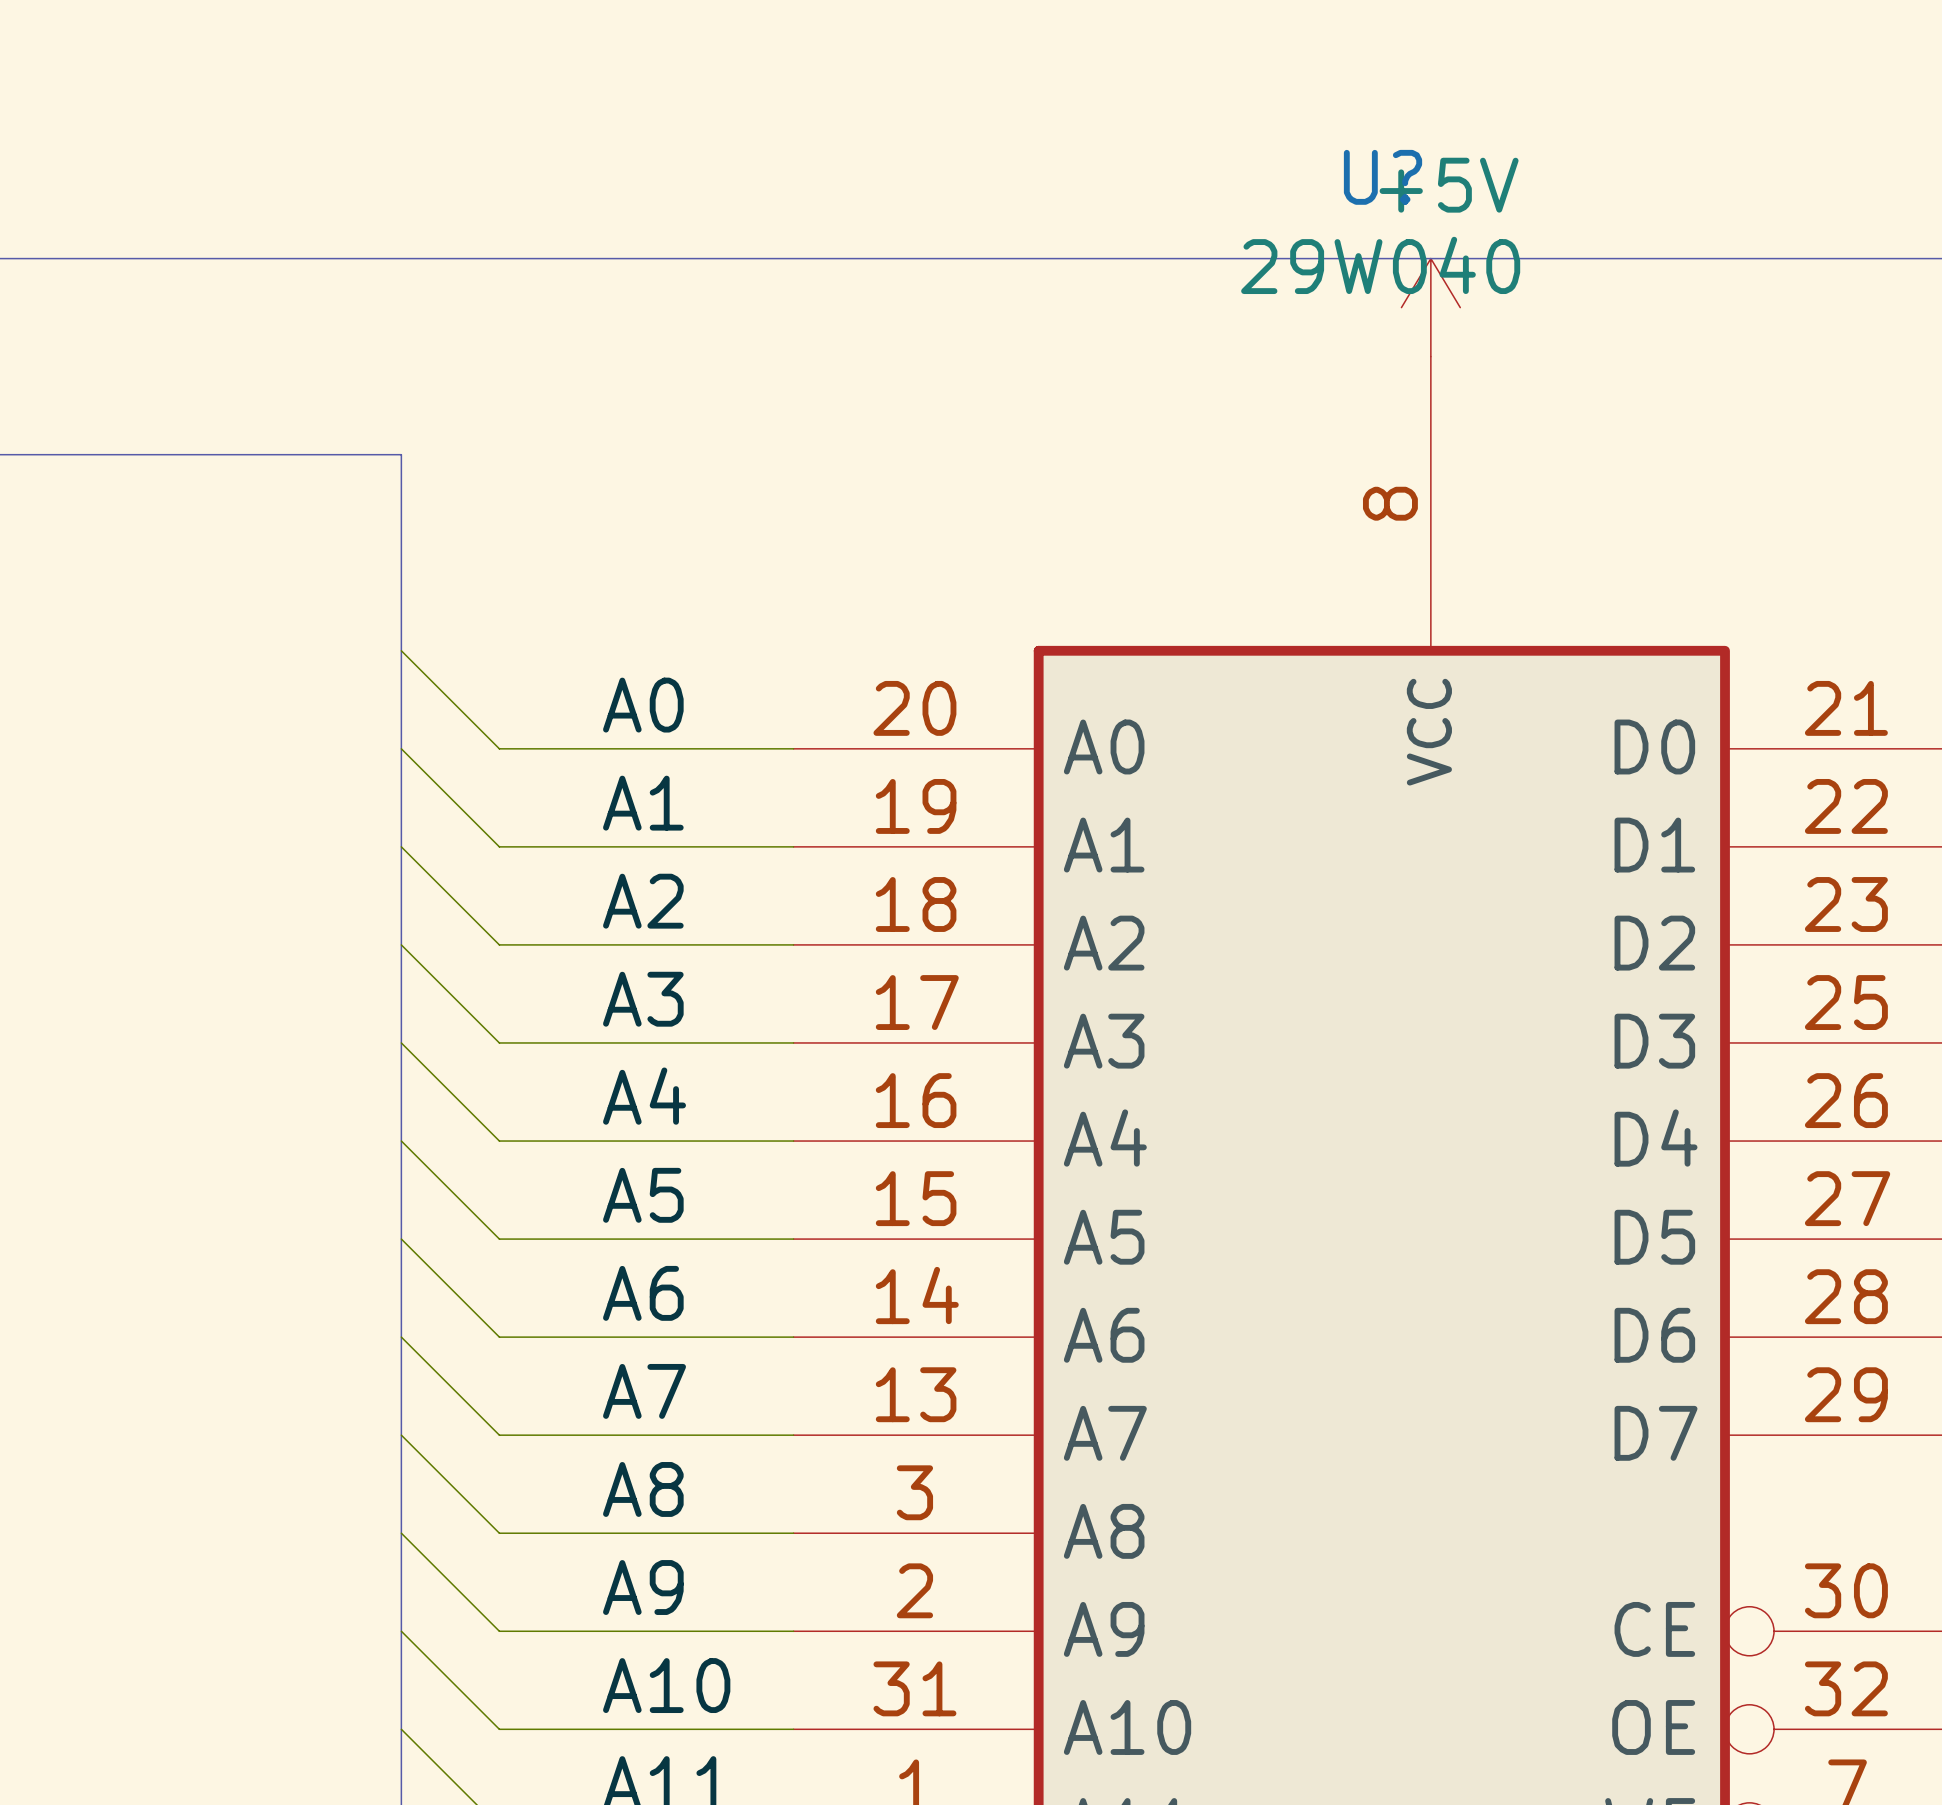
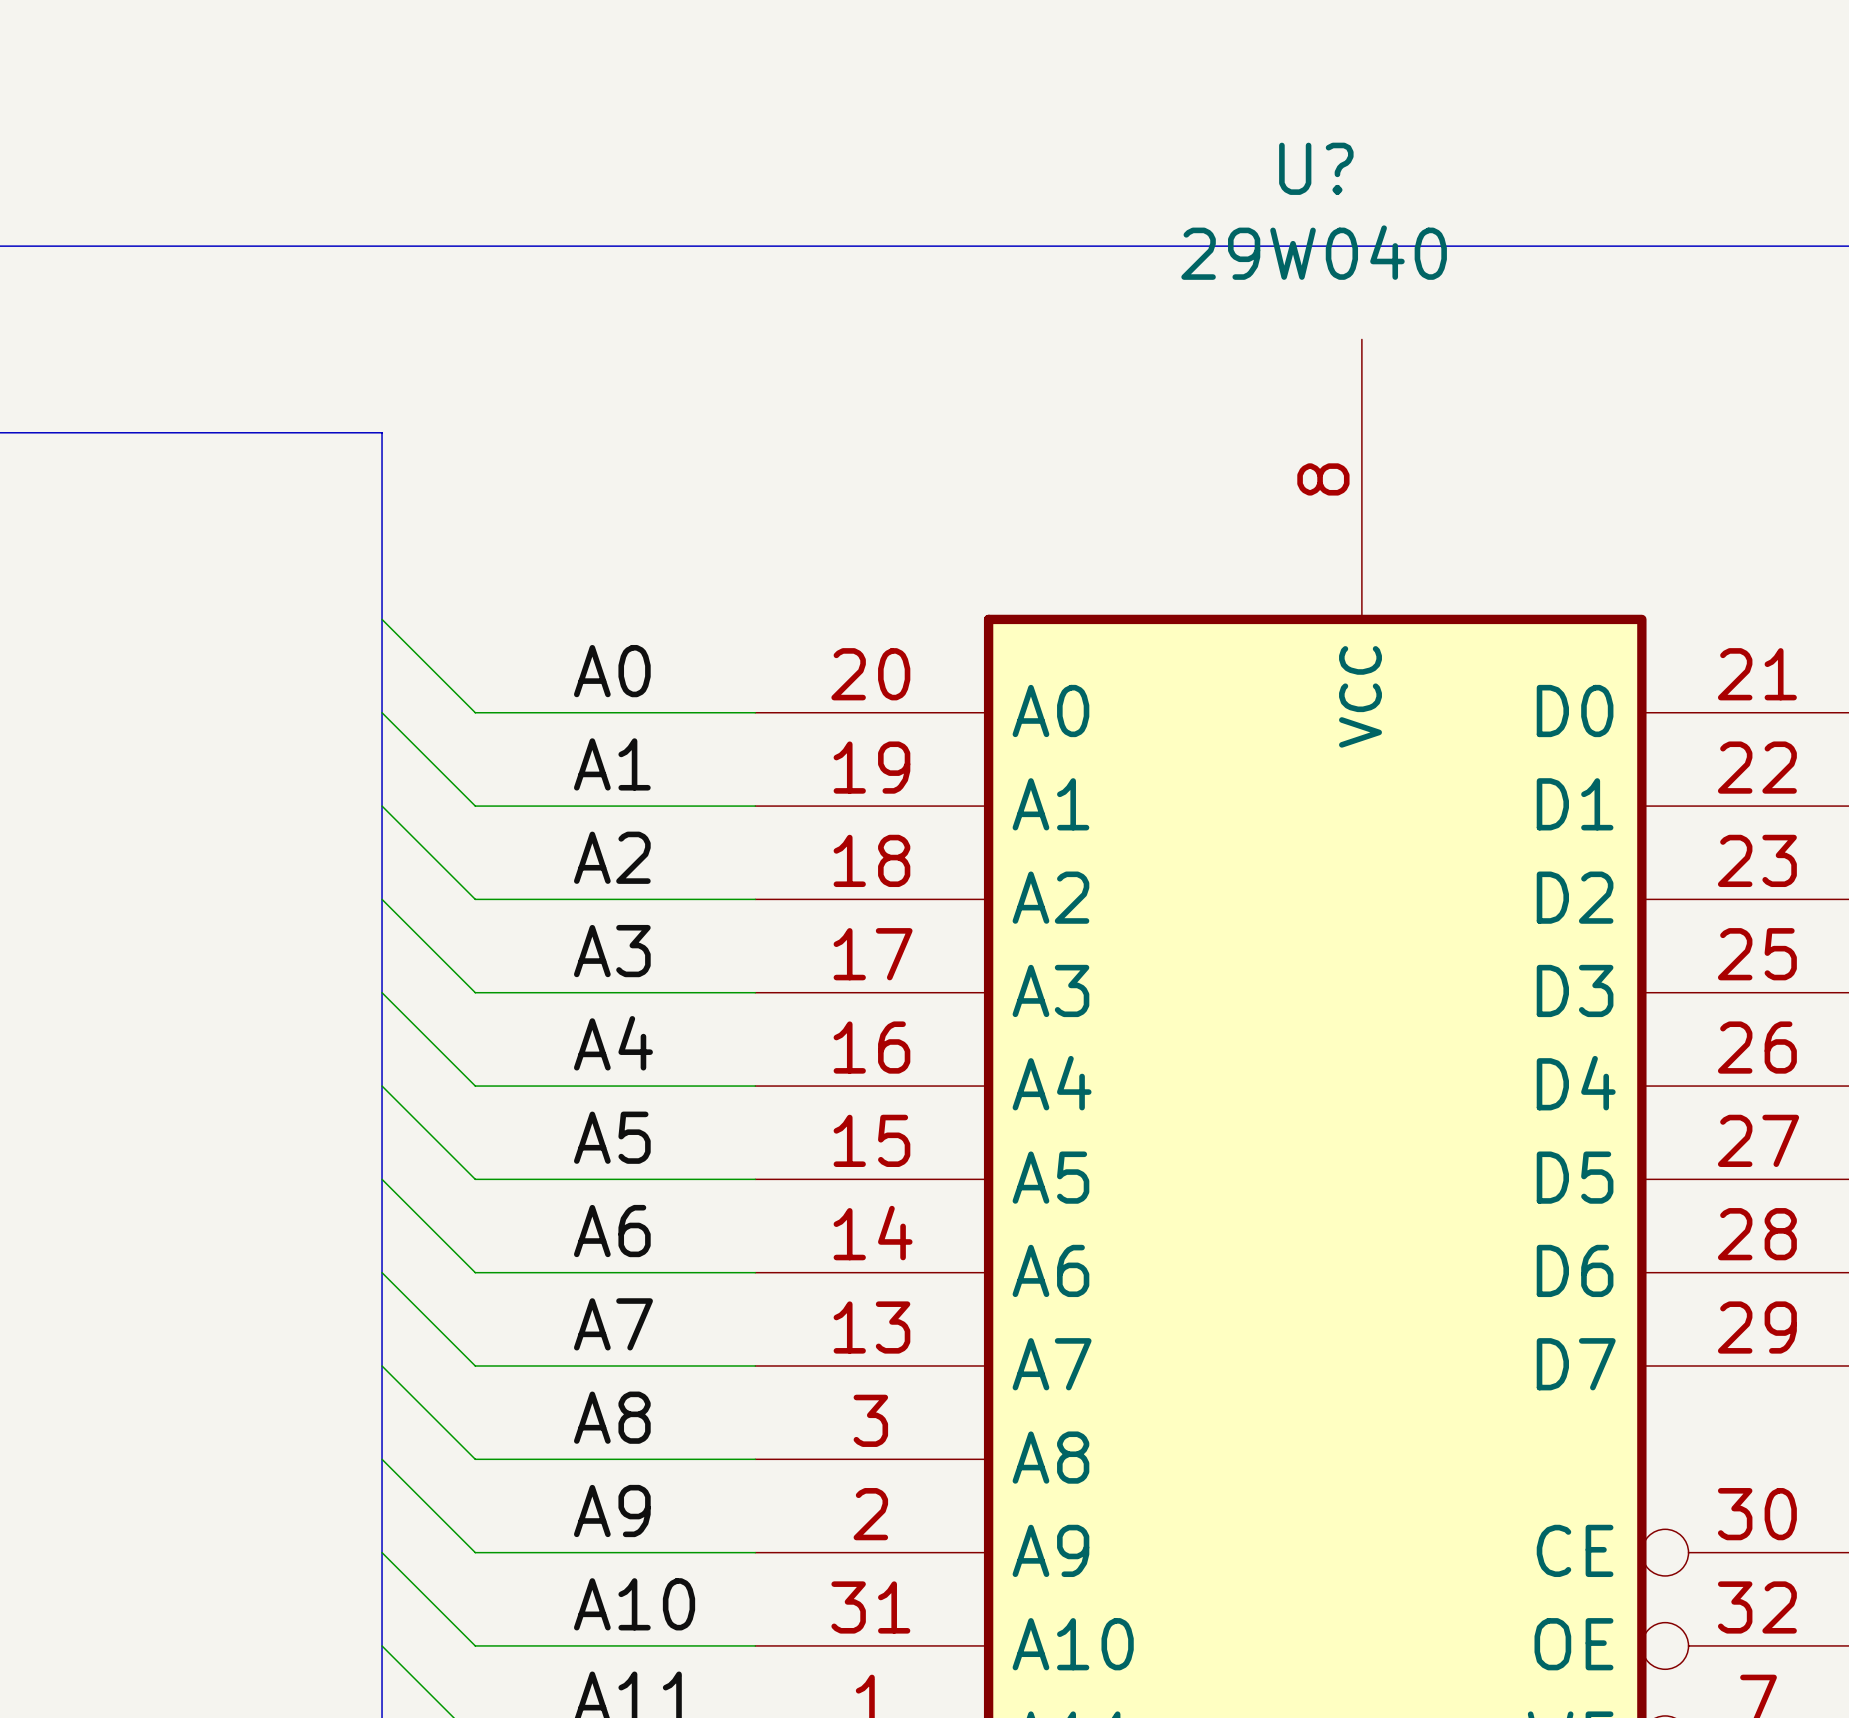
power symbol: +5V (1430, 307) -> none

